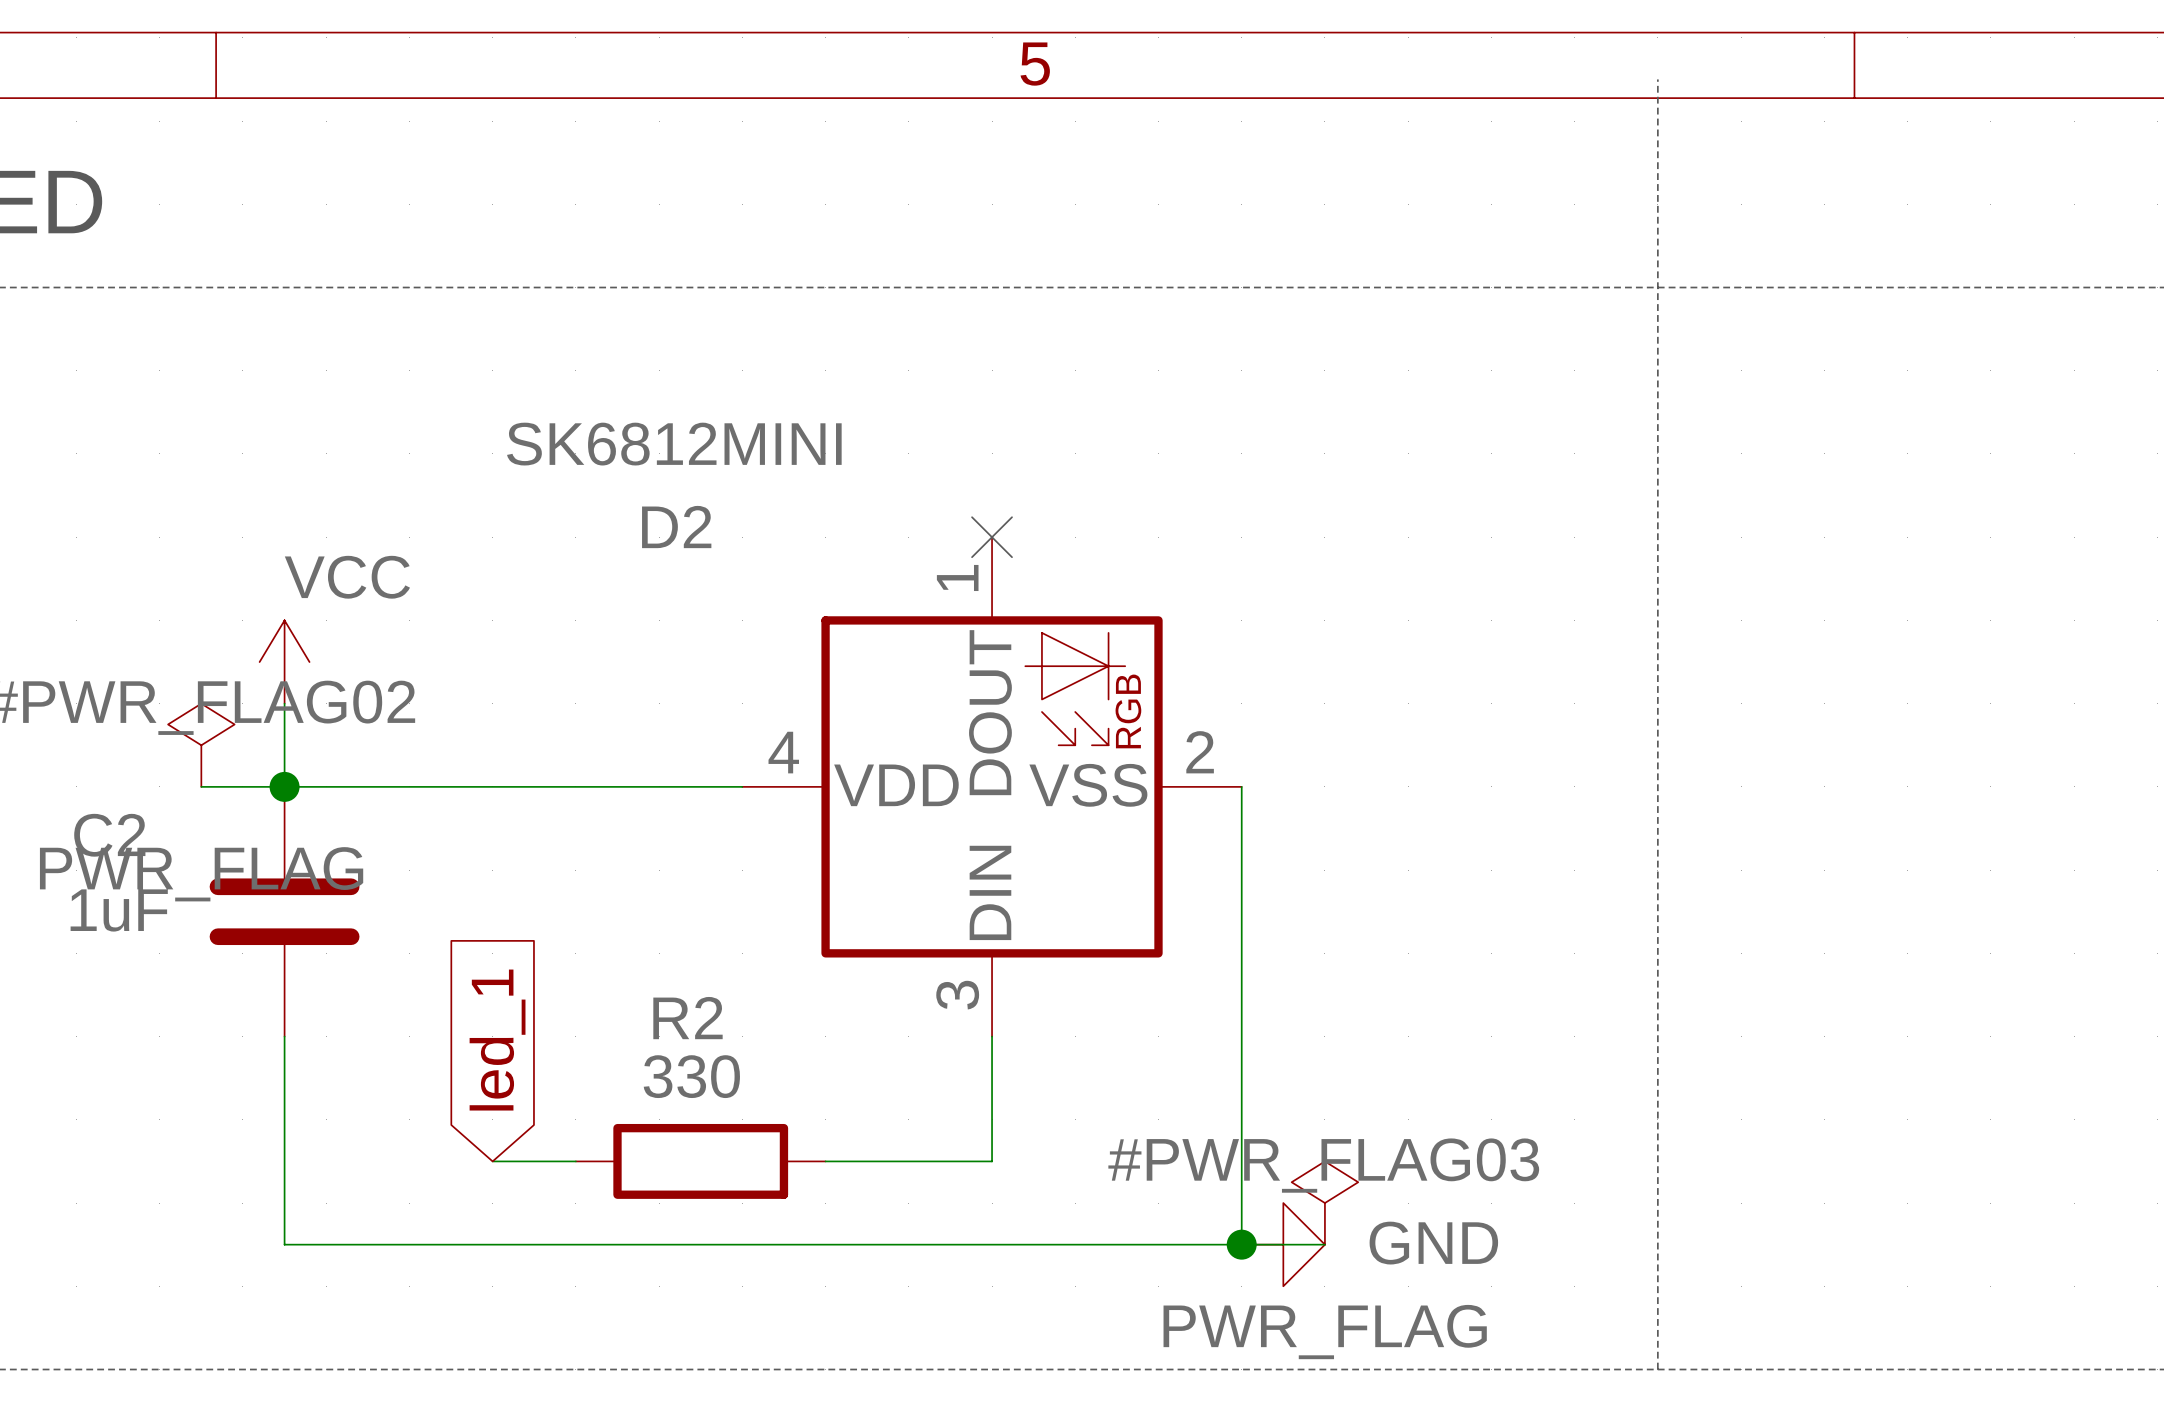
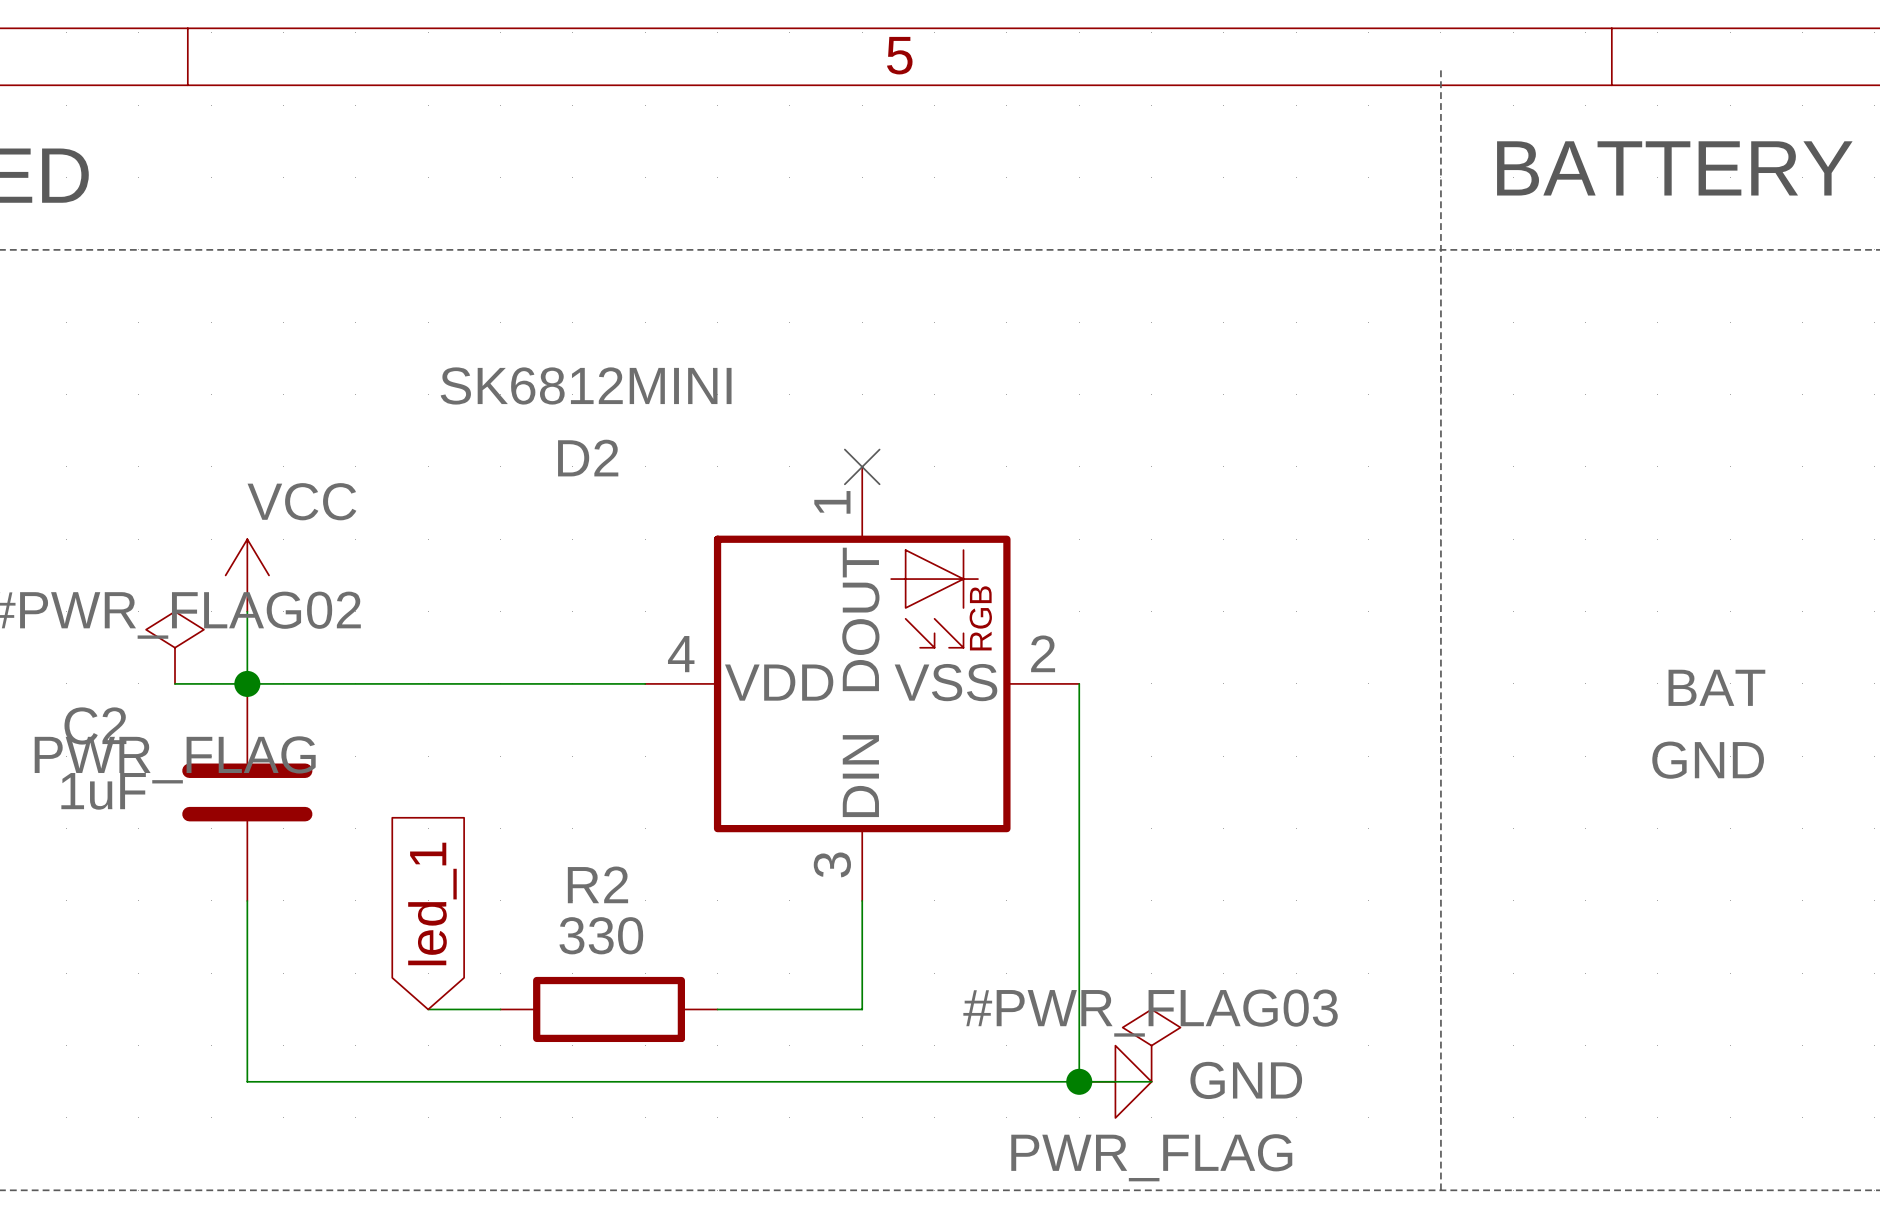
text: none -> BATTERY (1674, 168)
label: none -> BAT (1716, 687)
label: none -> GND (1708, 760)

